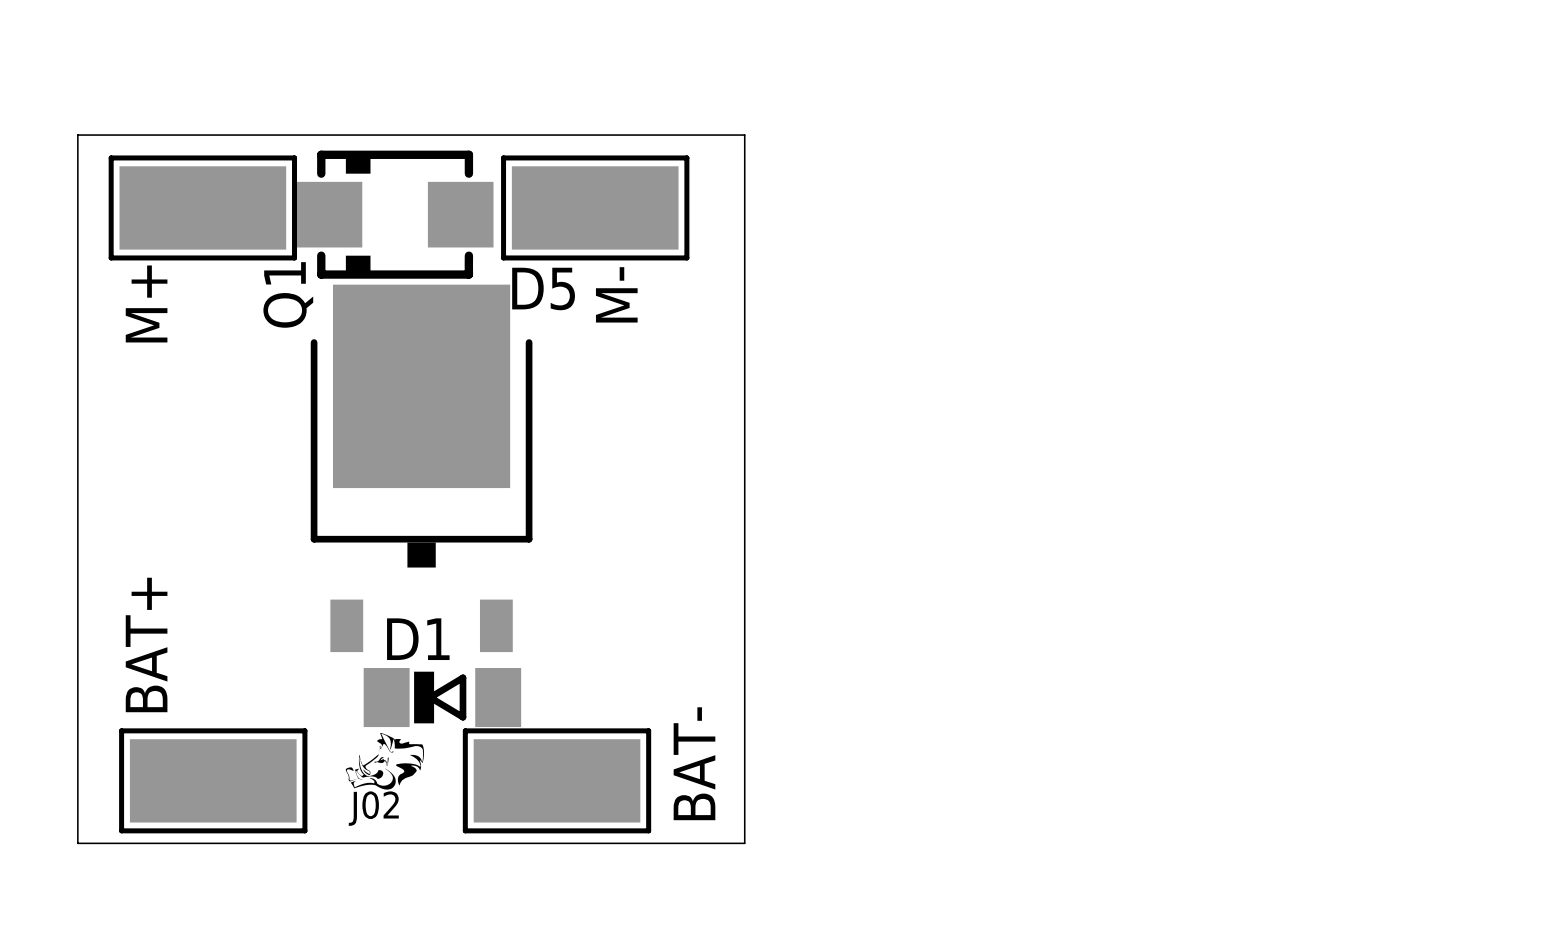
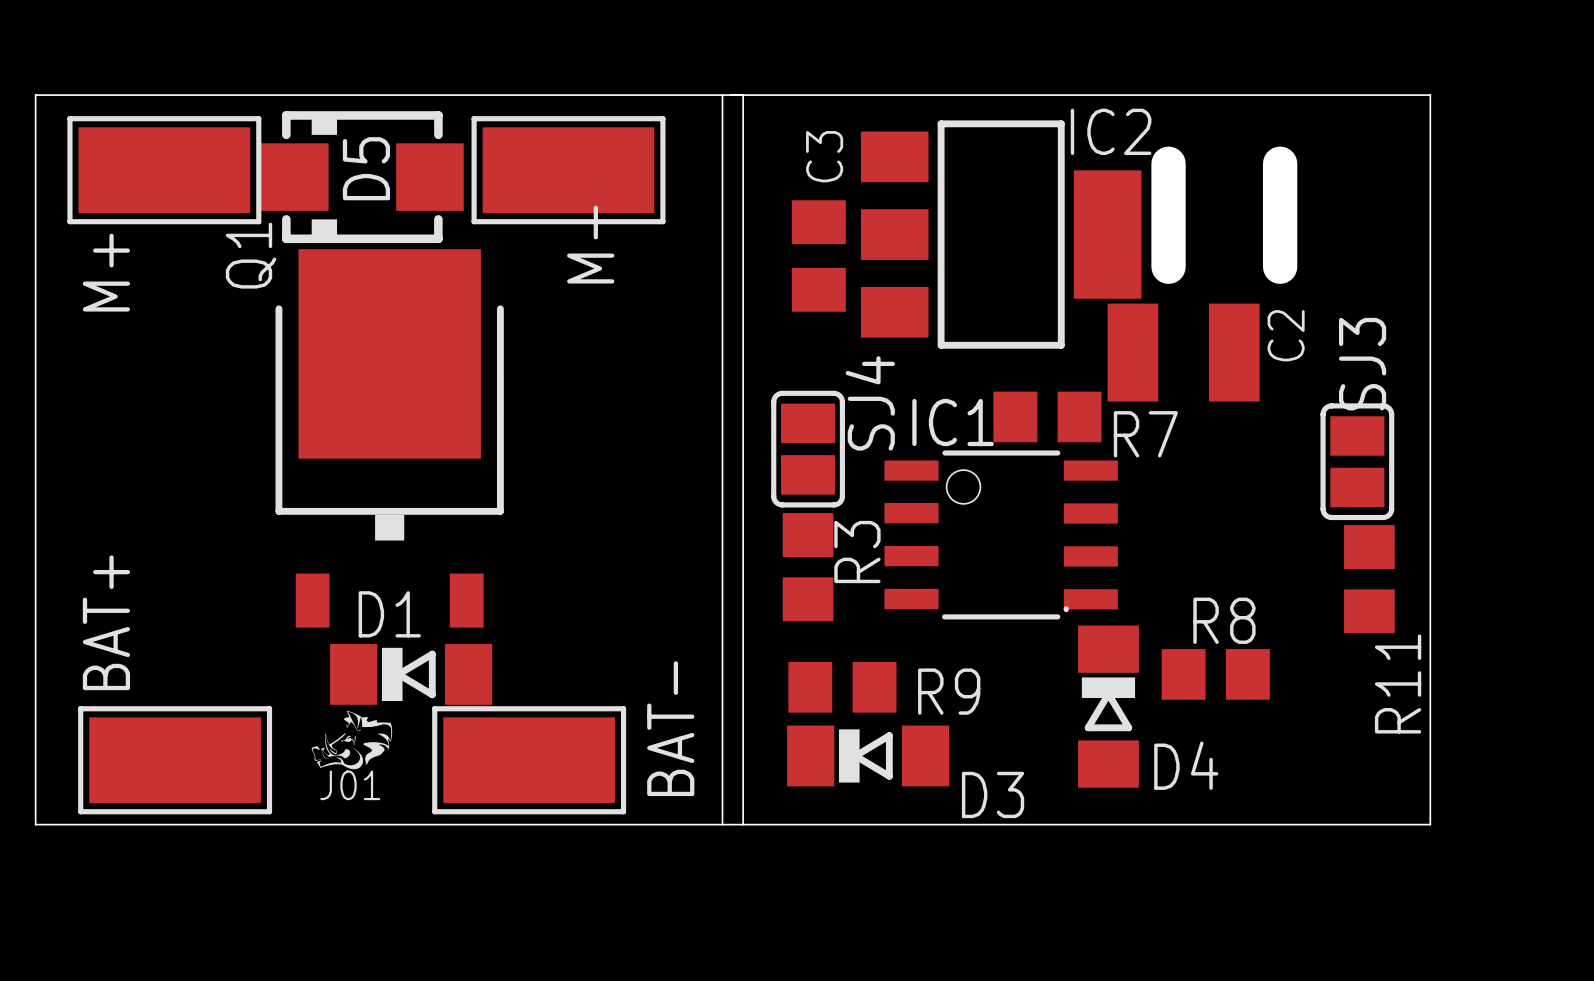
board edge: none -> (722, 95) (1430, 95) (1430, 824) (722, 824)
board edge: none -> (743, 95) (743, 824)
board edge: none -> (1168, 163) (1168, 266)
board edge: none -> (1280, 163) (1280, 266)
IC2: none -> (1001, 234)
D5 name rotation: 0° (543, 288) -> 90° counterclockwise (366, 168)
D5 name position: D5 (543, 288) -> D5 (366, 168)
C3: none -> (818, 256)
C2: none -> (1183, 352)
R7: none -> (1047, 416)
SJ4: none -> (808, 449)
SJ3: none -> (1357, 461)
IC1: none -> (1001, 534)
R3: none -> (808, 567)
R11: none -> (1369, 579)
R8: none -> (1215, 674)
R9: none -> (842, 687)
D4: none -> (1108, 706)
D3: none -> (868, 755)
text: J02 (373, 808) -> J01 (350, 785)

